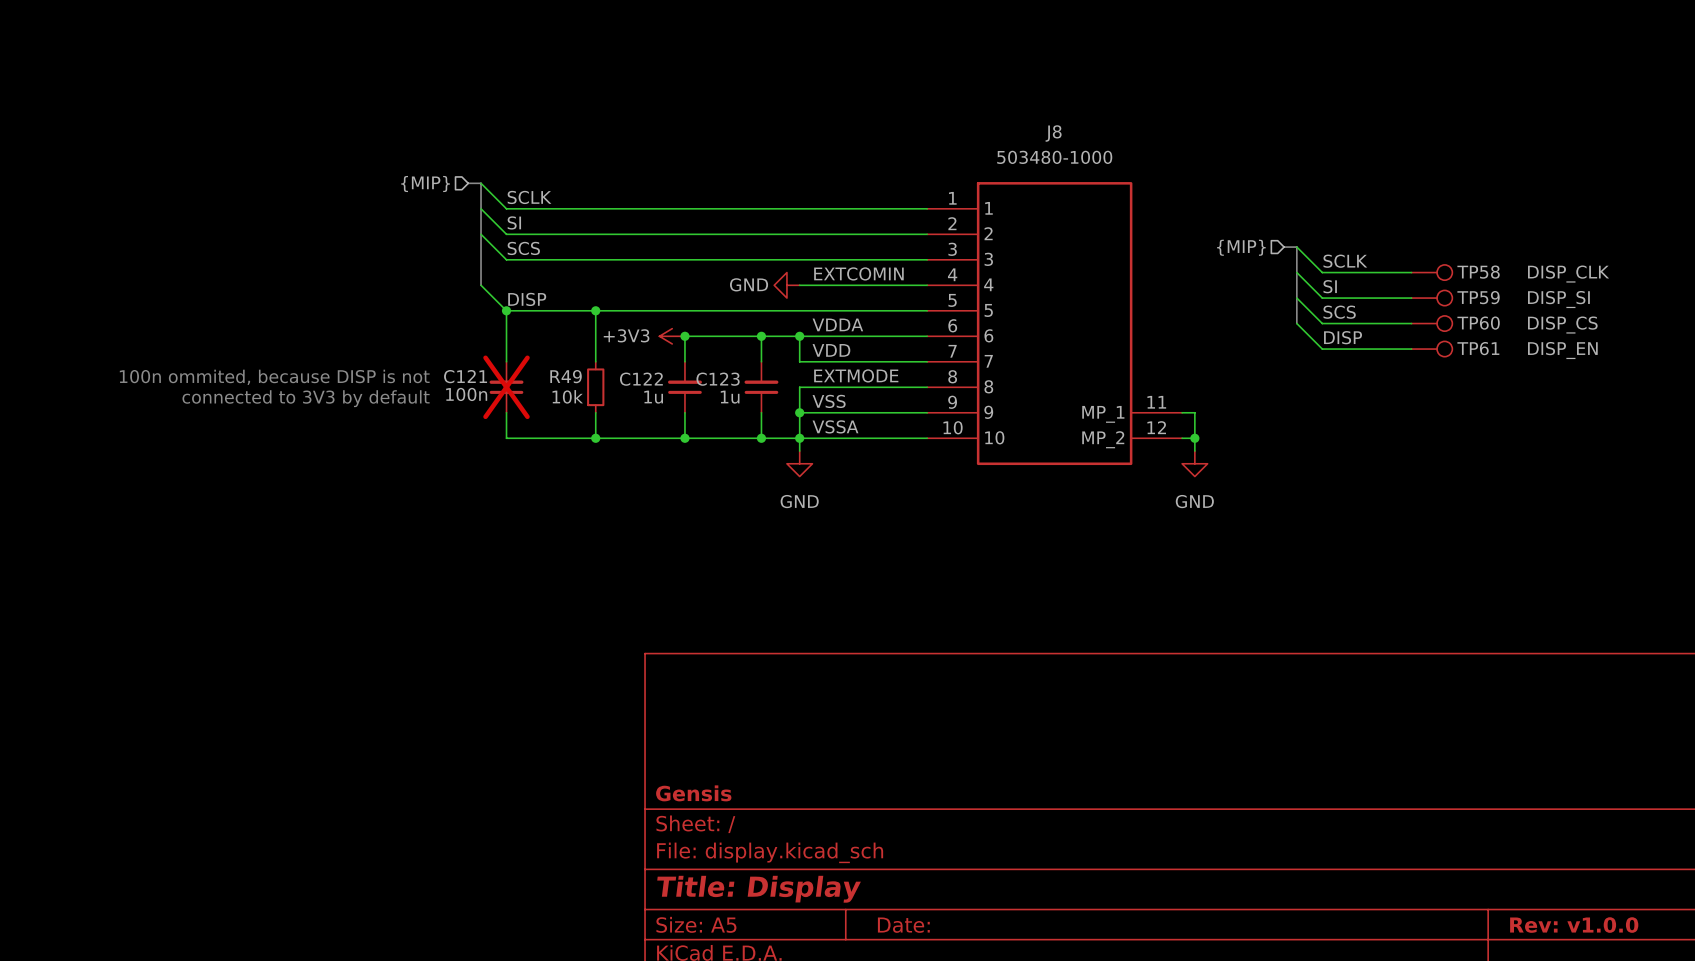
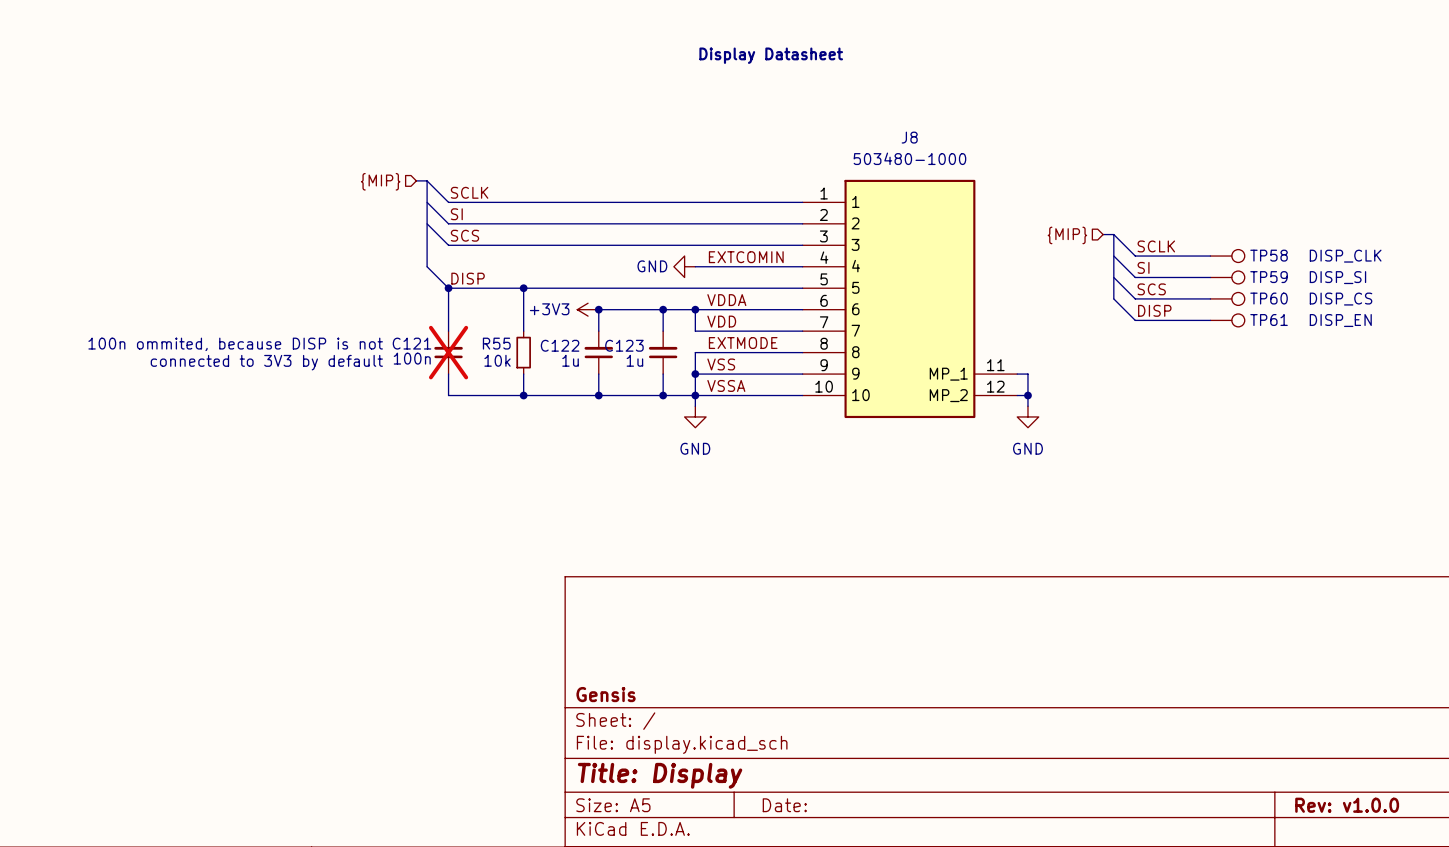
text: none -> Display Datasheet (771, 55)
R49 name: R49 (566, 376) -> R55 (496, 343)

